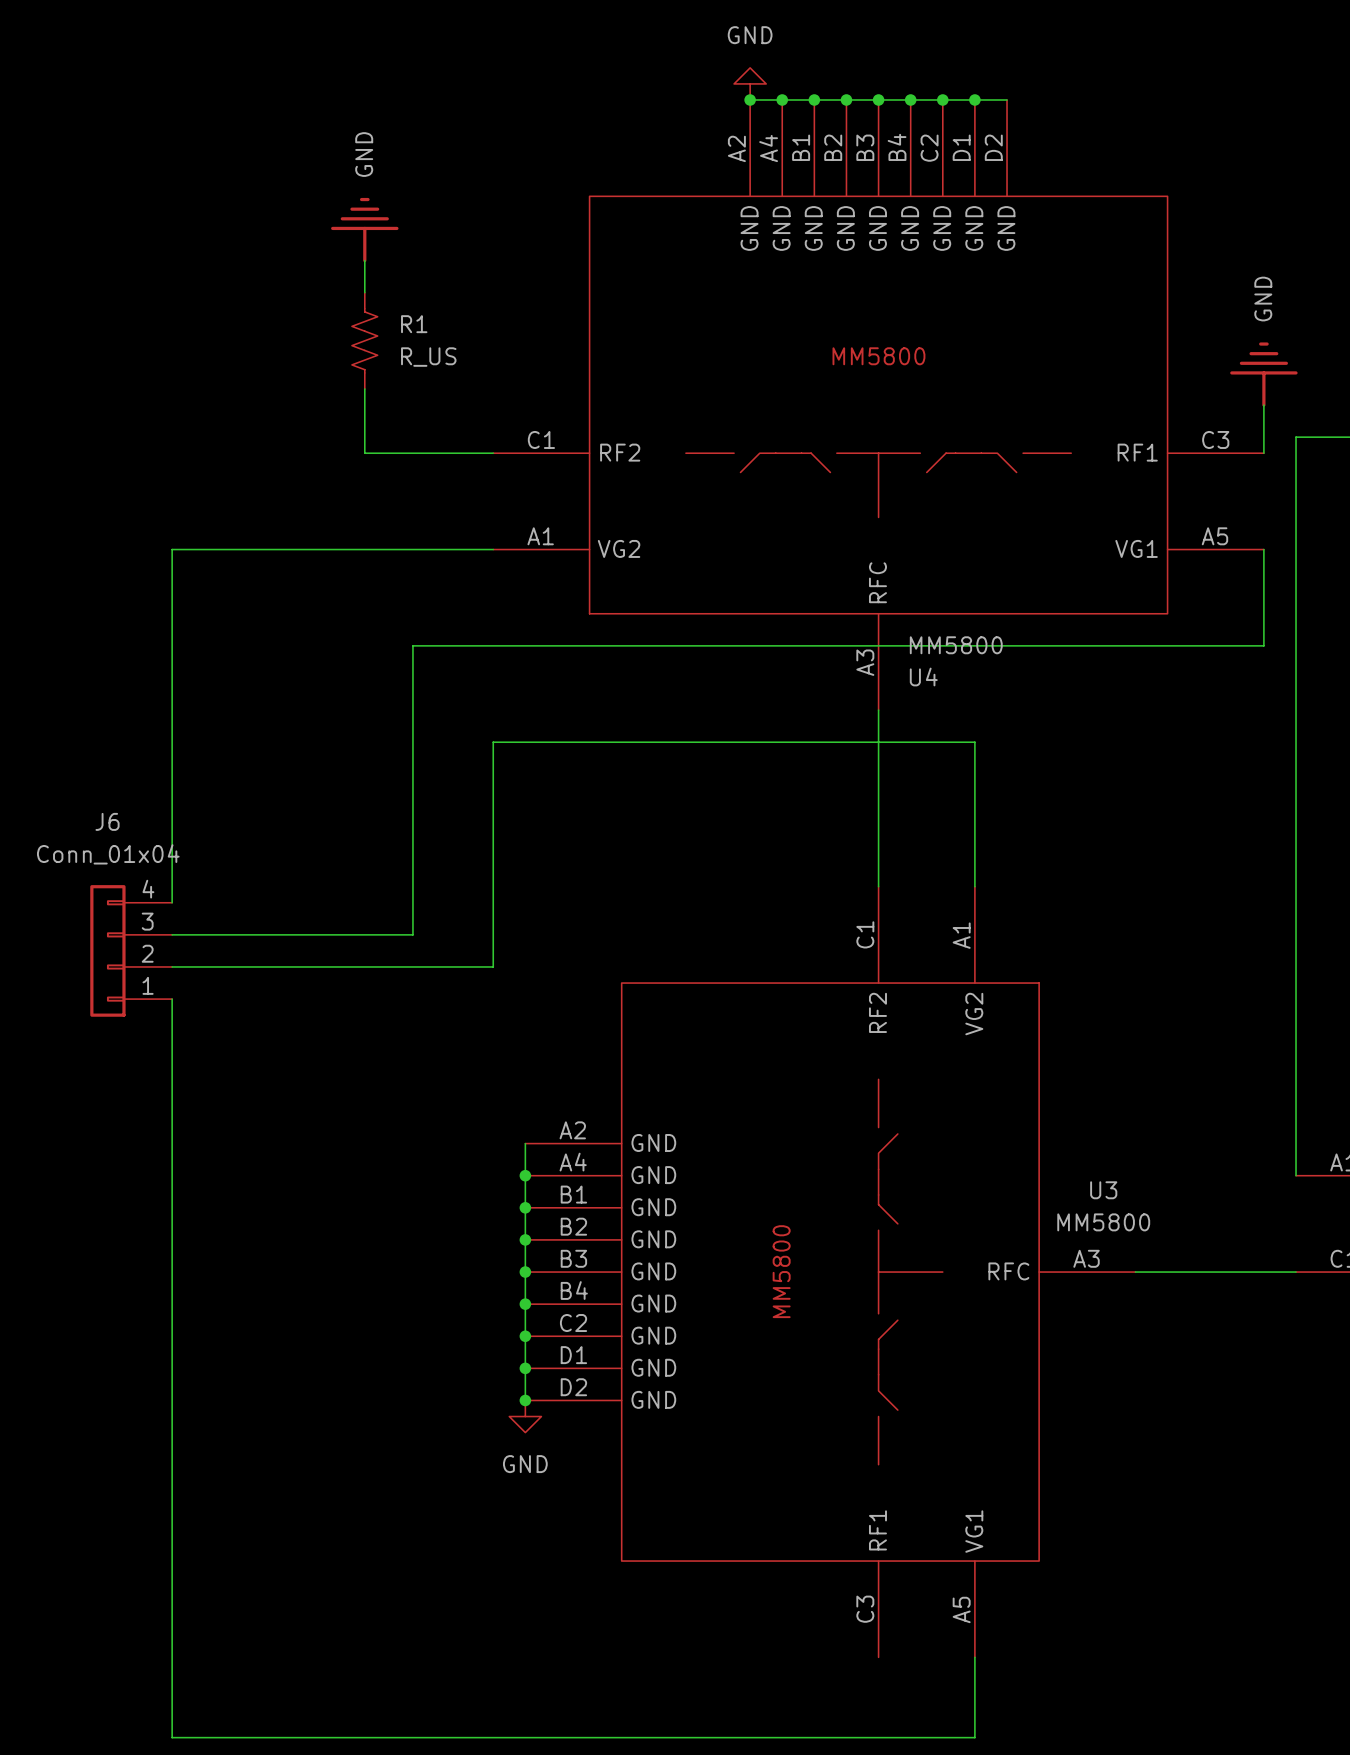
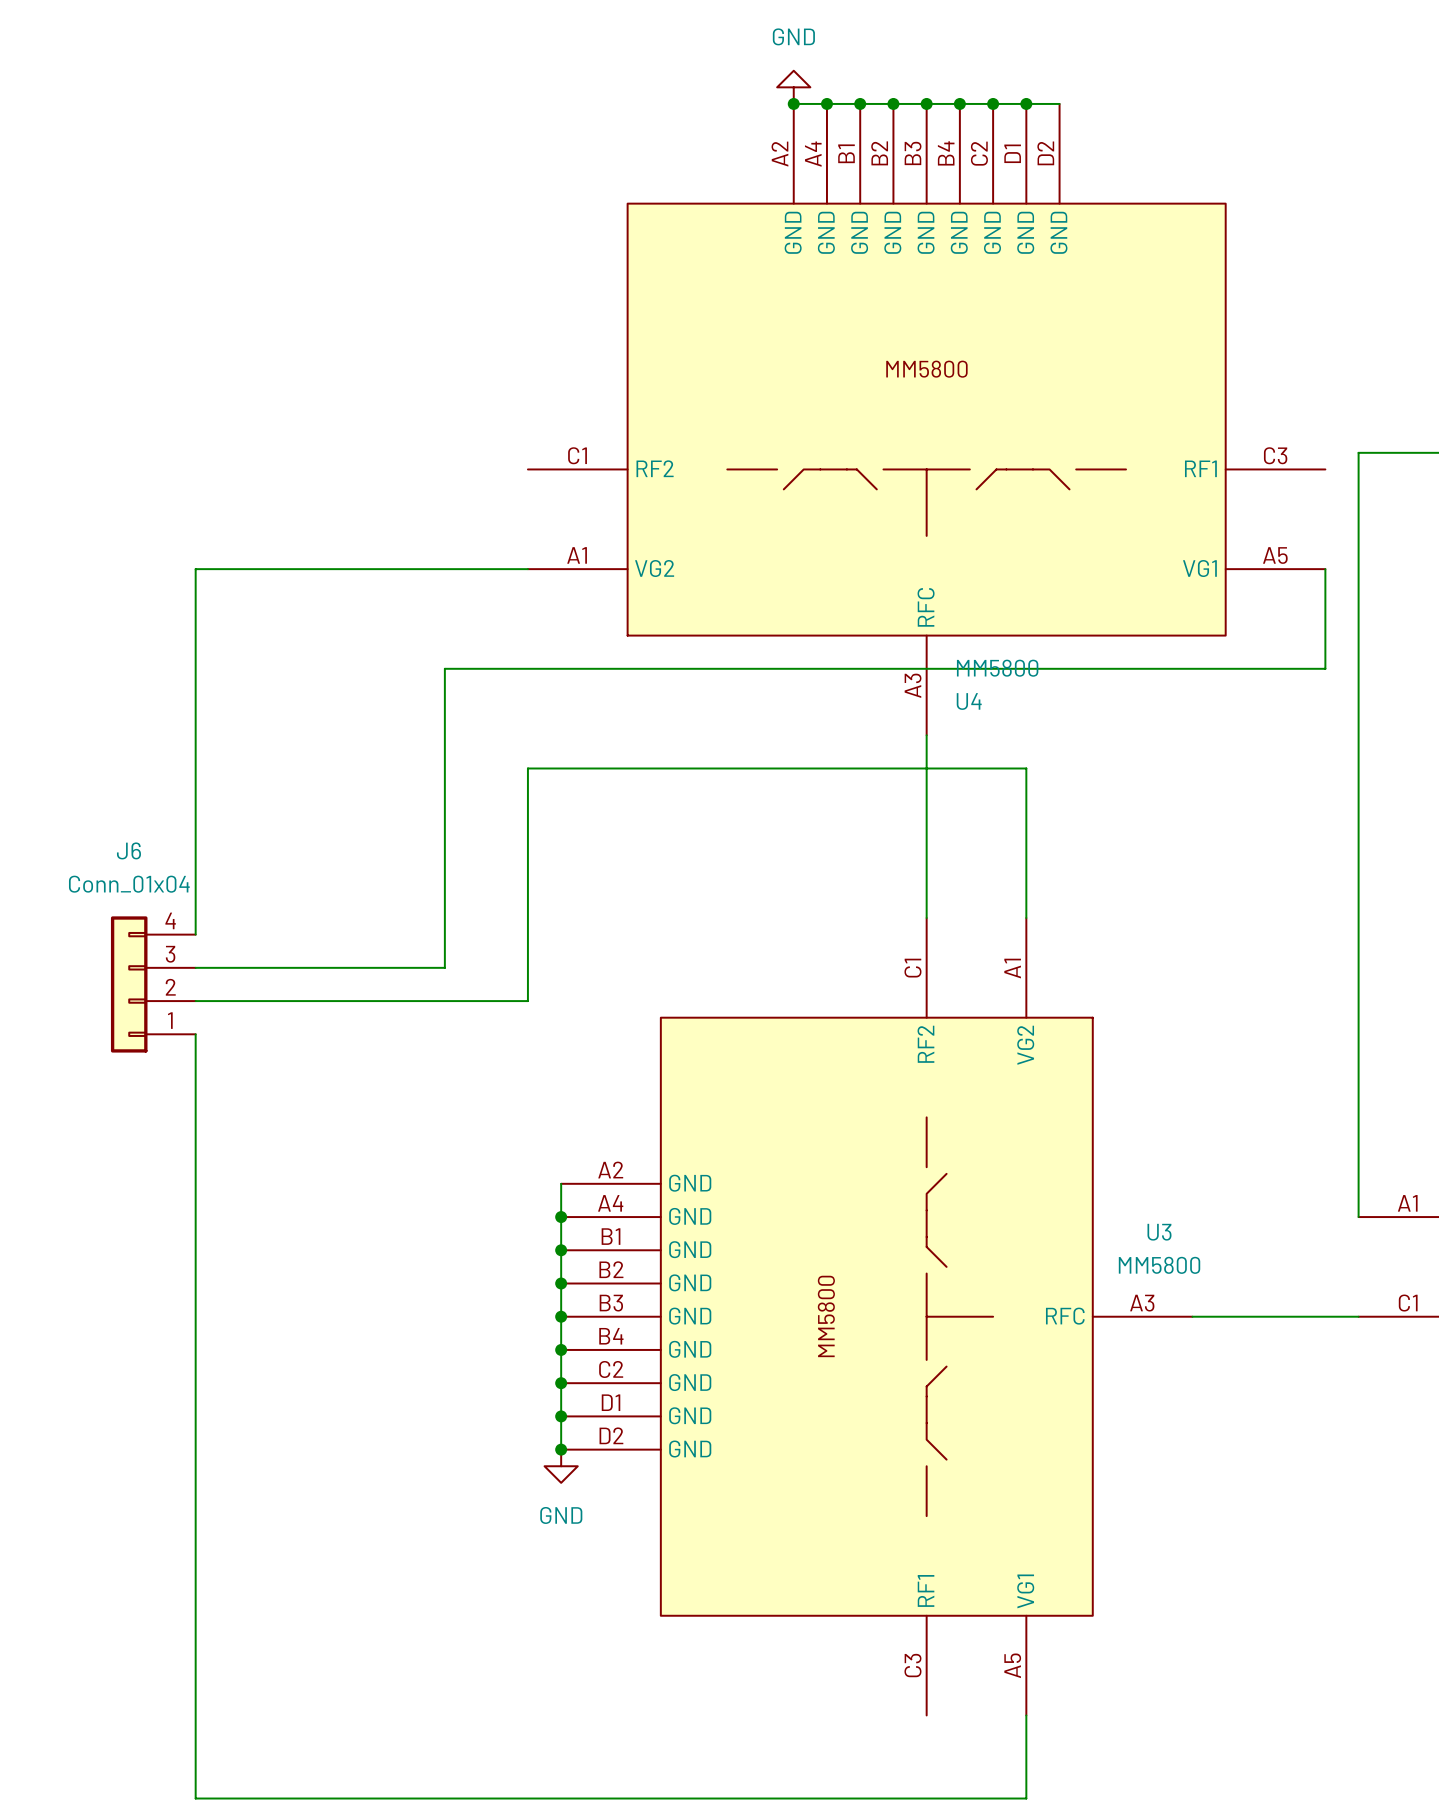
power symbol: GND (364, 230) -> none
wire: (364, 260) (364, 292) -> none
R1: R_US (364, 340) -> none
power symbol: GND (1263, 374) -> none
wire: (364, 388) (364, 453) (493, 453) -> none
wire: (1263, 405) (1263, 453) -> none

